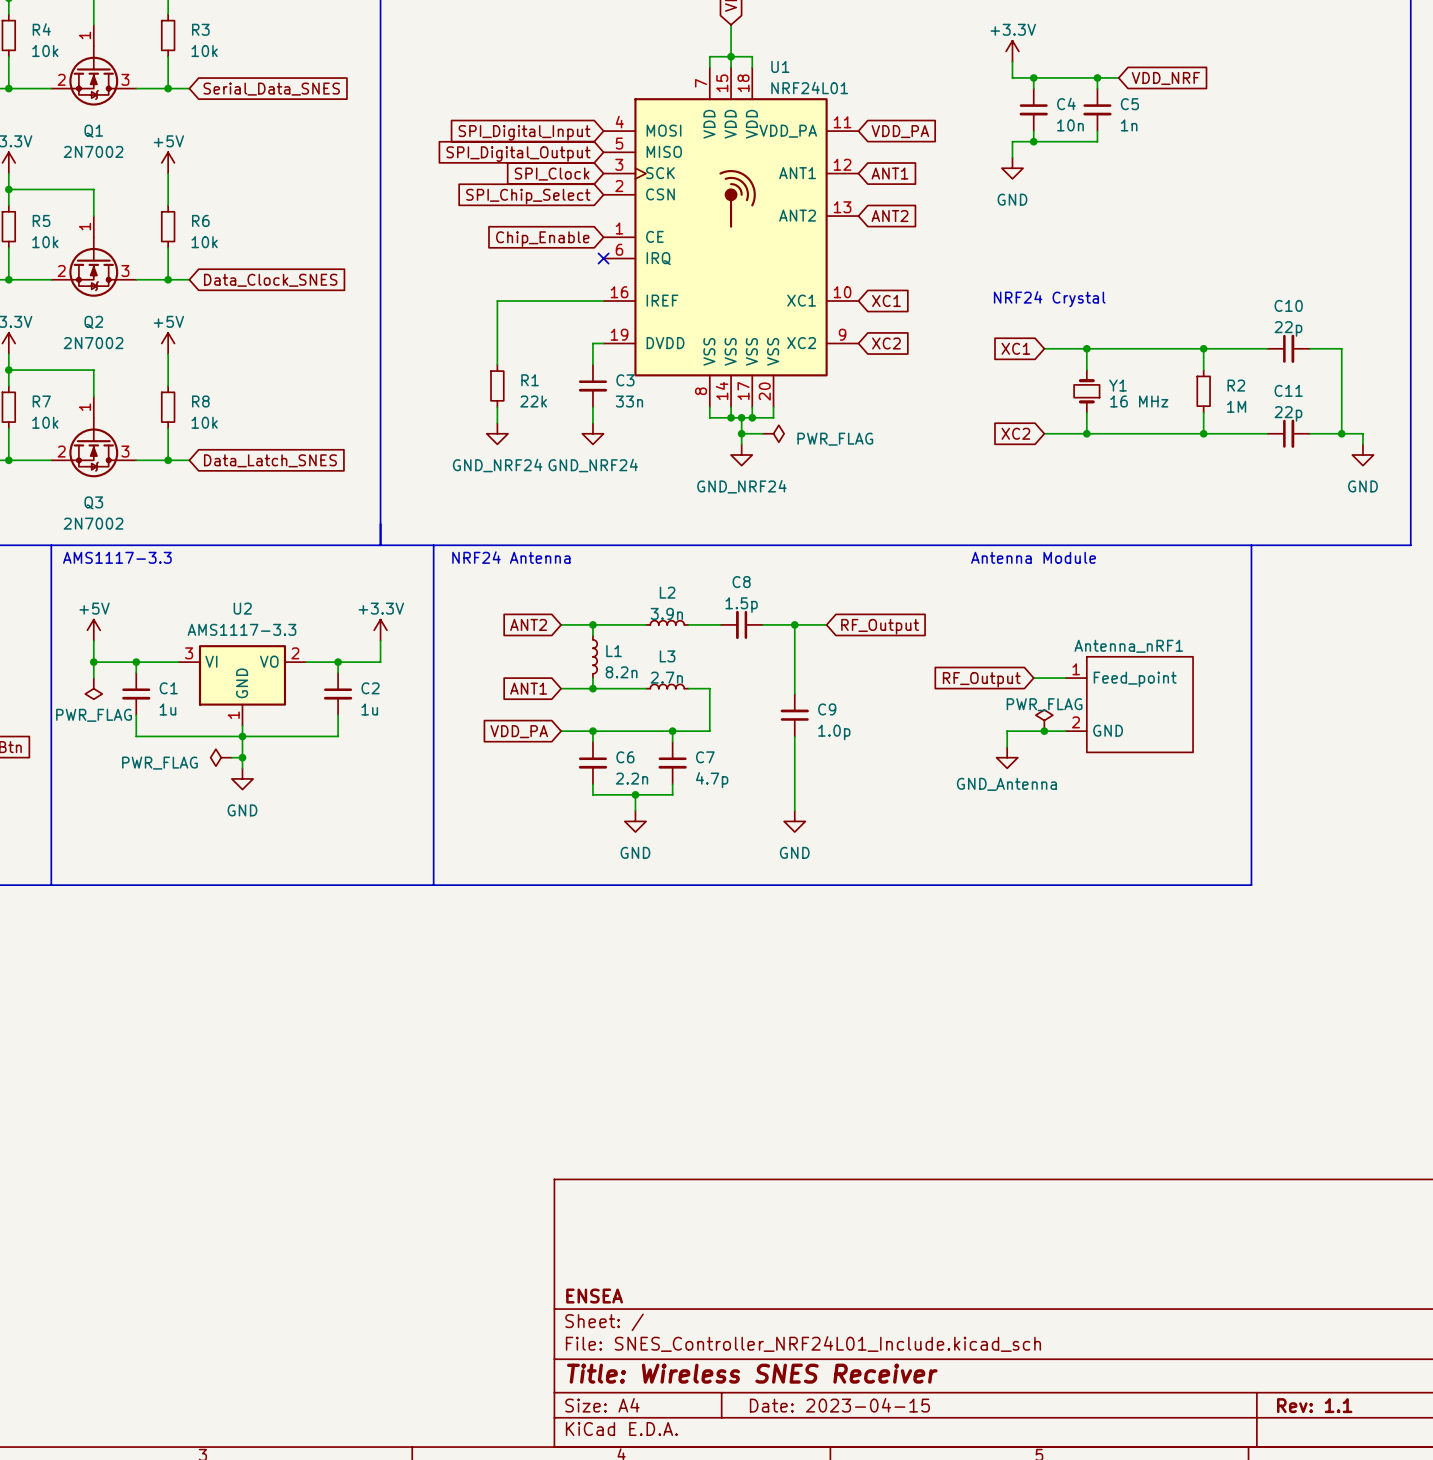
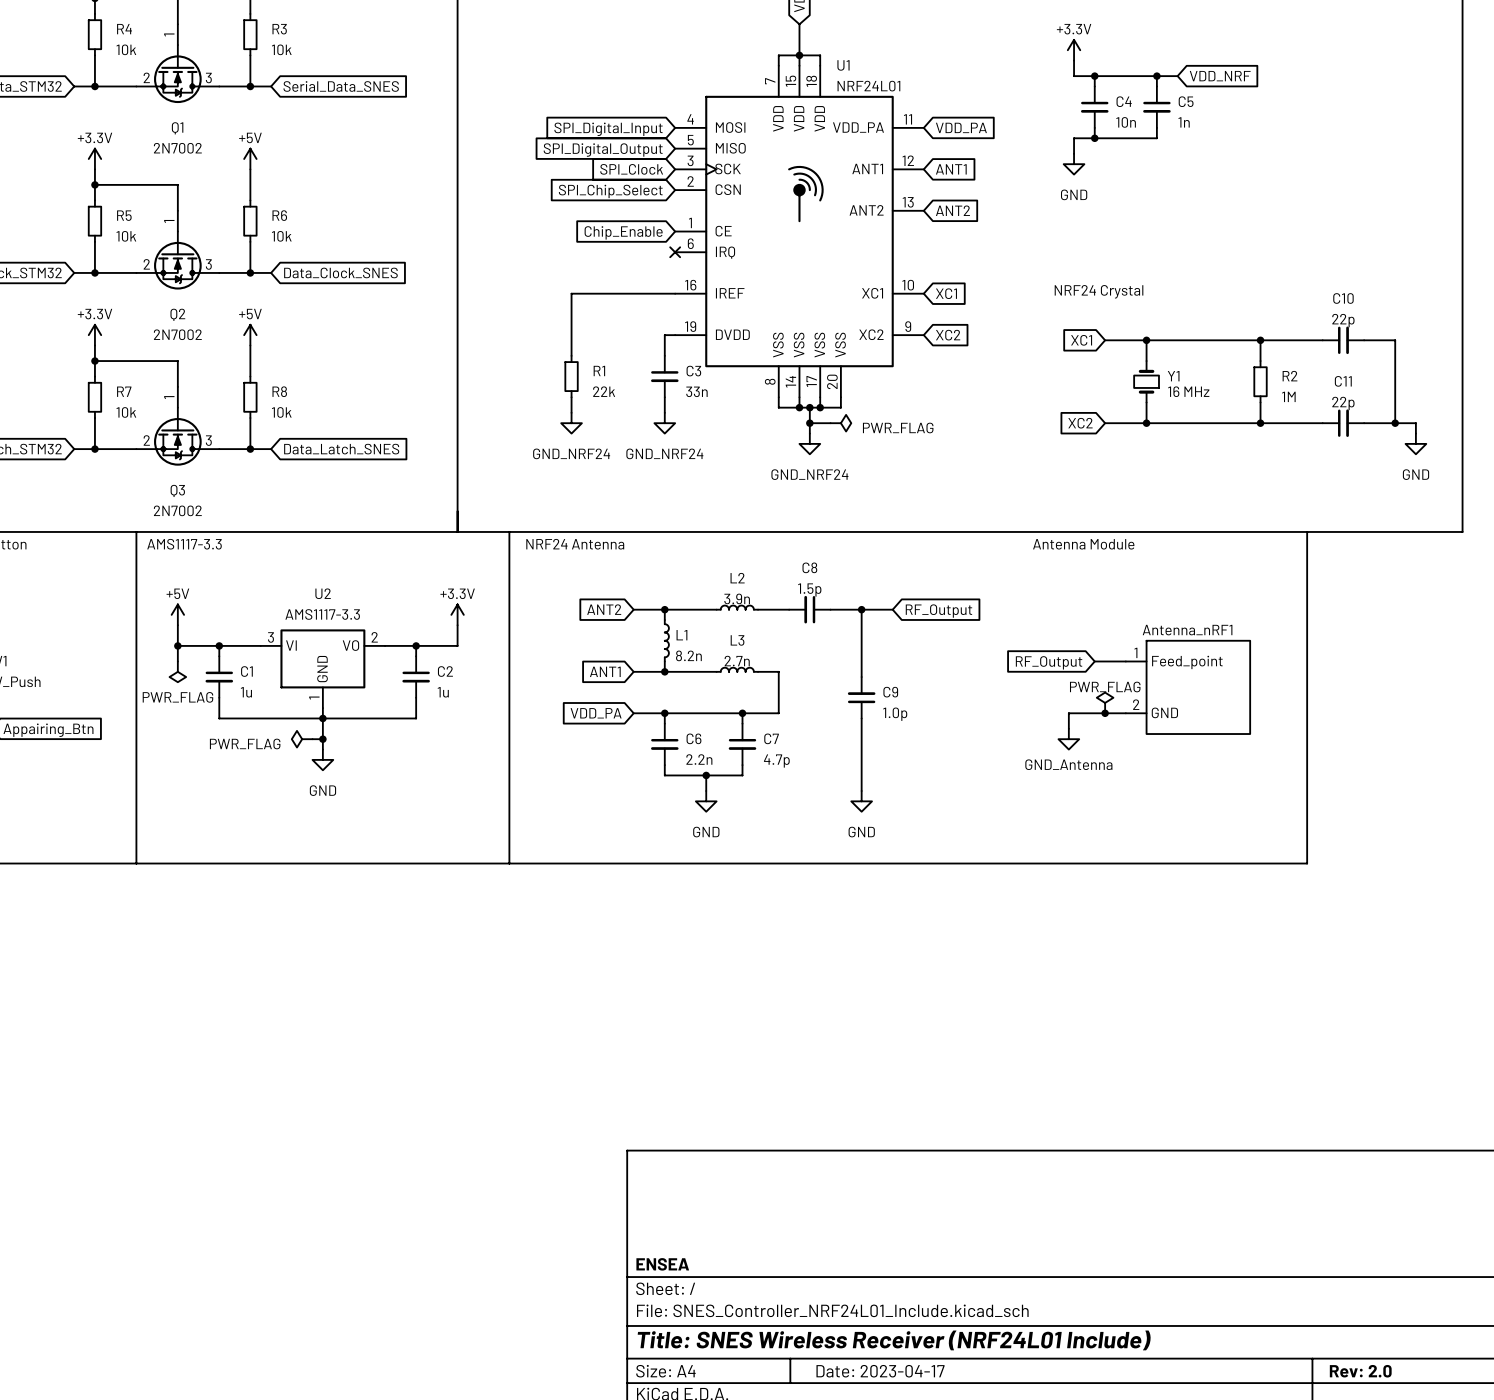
title block: Title: Wireless SNES Receiver (752, 1373) -> Title: SNES Wireless Receiver (NRF24L01 Include) (894, 1340)
title block: Date: 2023-04-15 (839, 1405) -> Date: 2023-04-17 (880, 1371)
title block: Rev: 1.1 (1314, 1405) -> Rev: 2.0 (1360, 1371)

